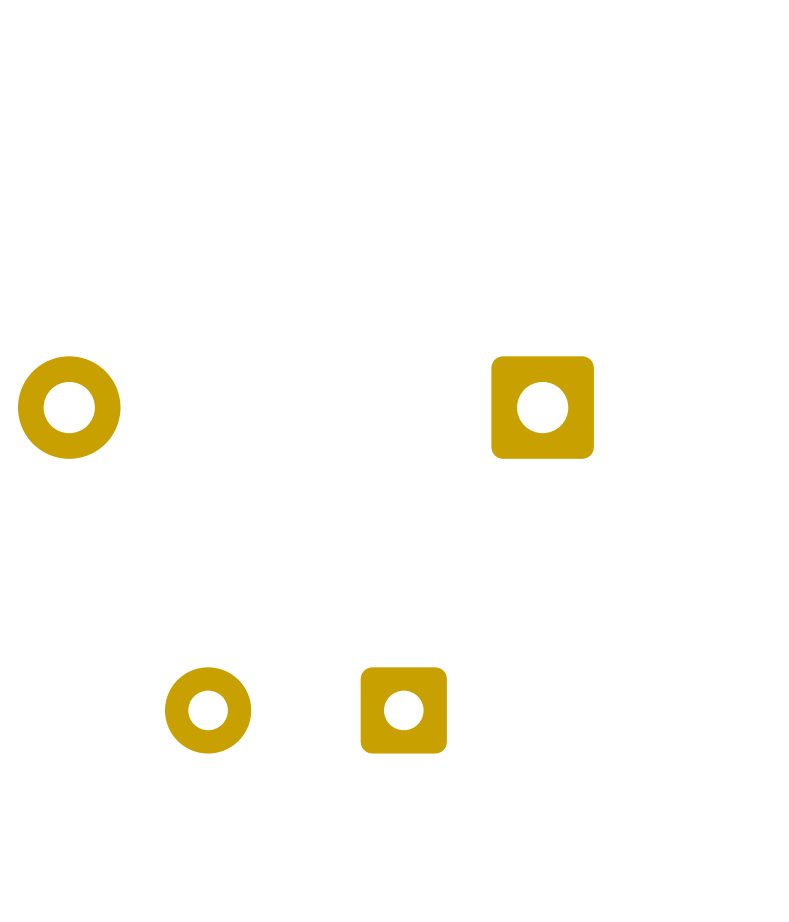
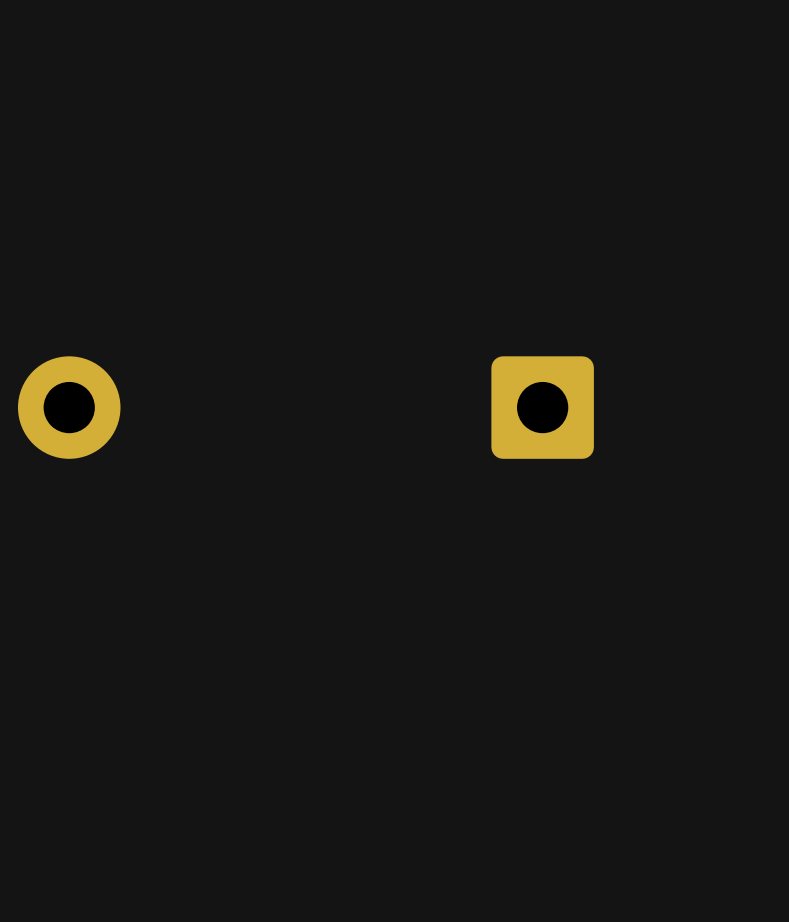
part: (305, 710) -> none

